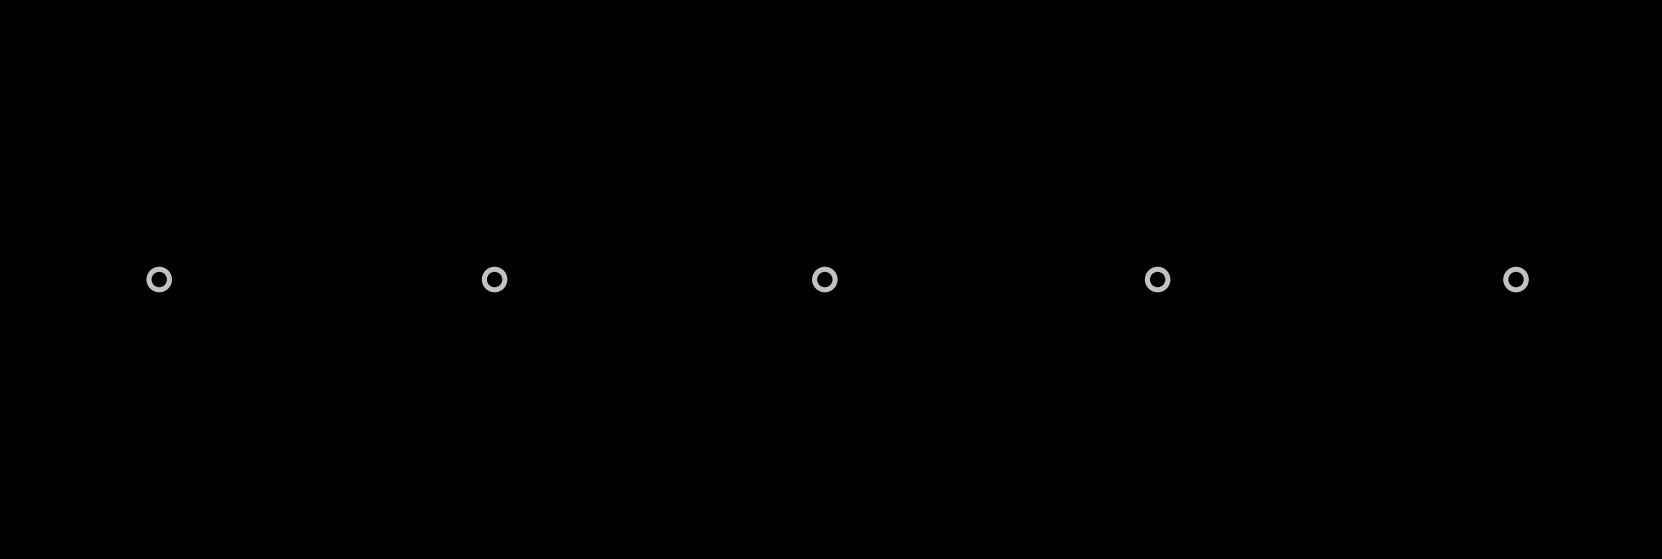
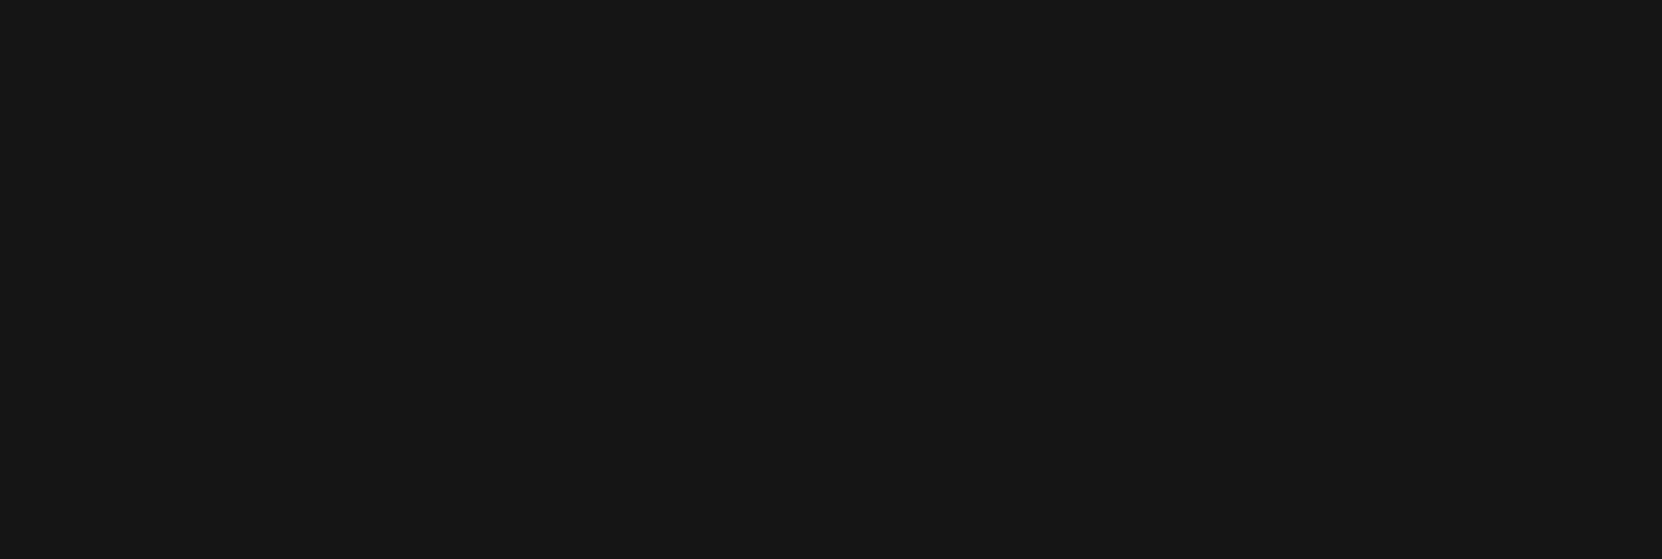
via: (159, 279) -> none
via: (494, 279) -> none
via: (824, 279) -> none
via: (1157, 279) -> none
via: (1516, 279) -> none

